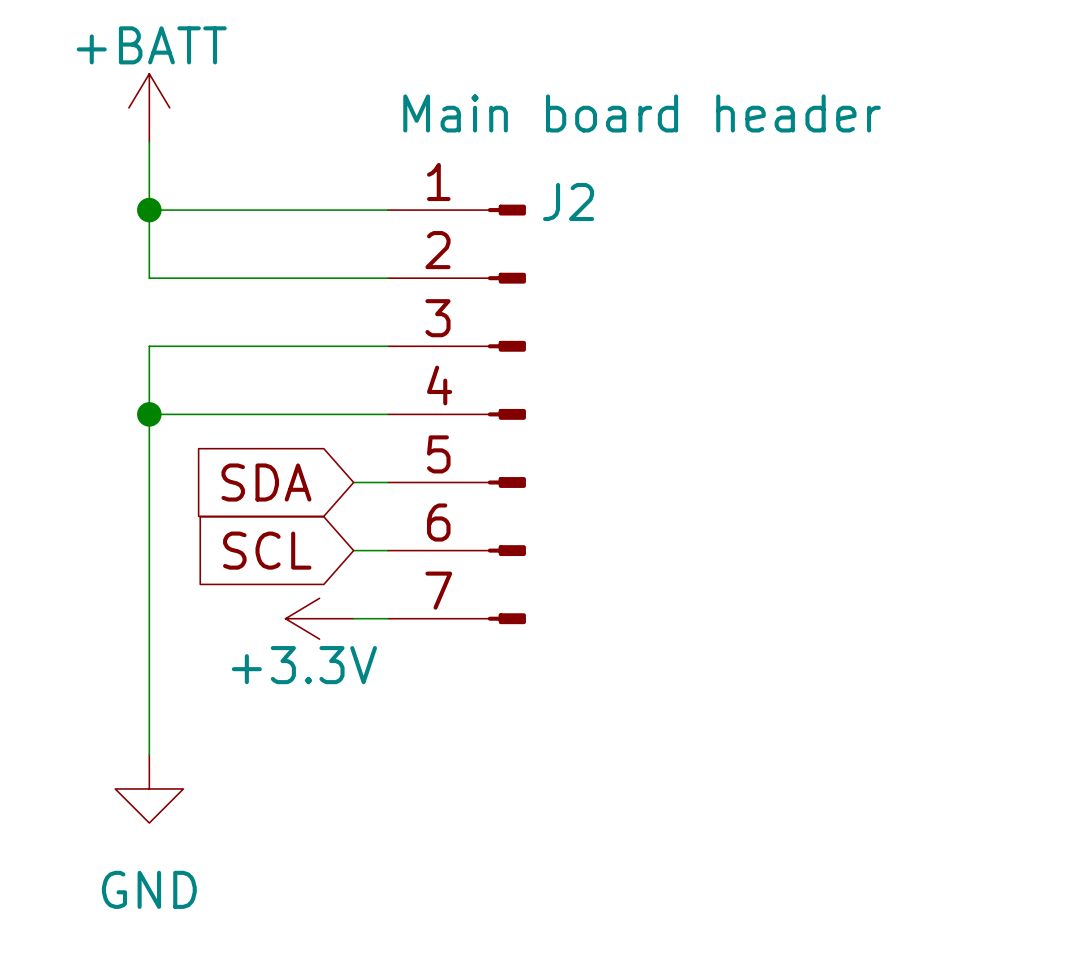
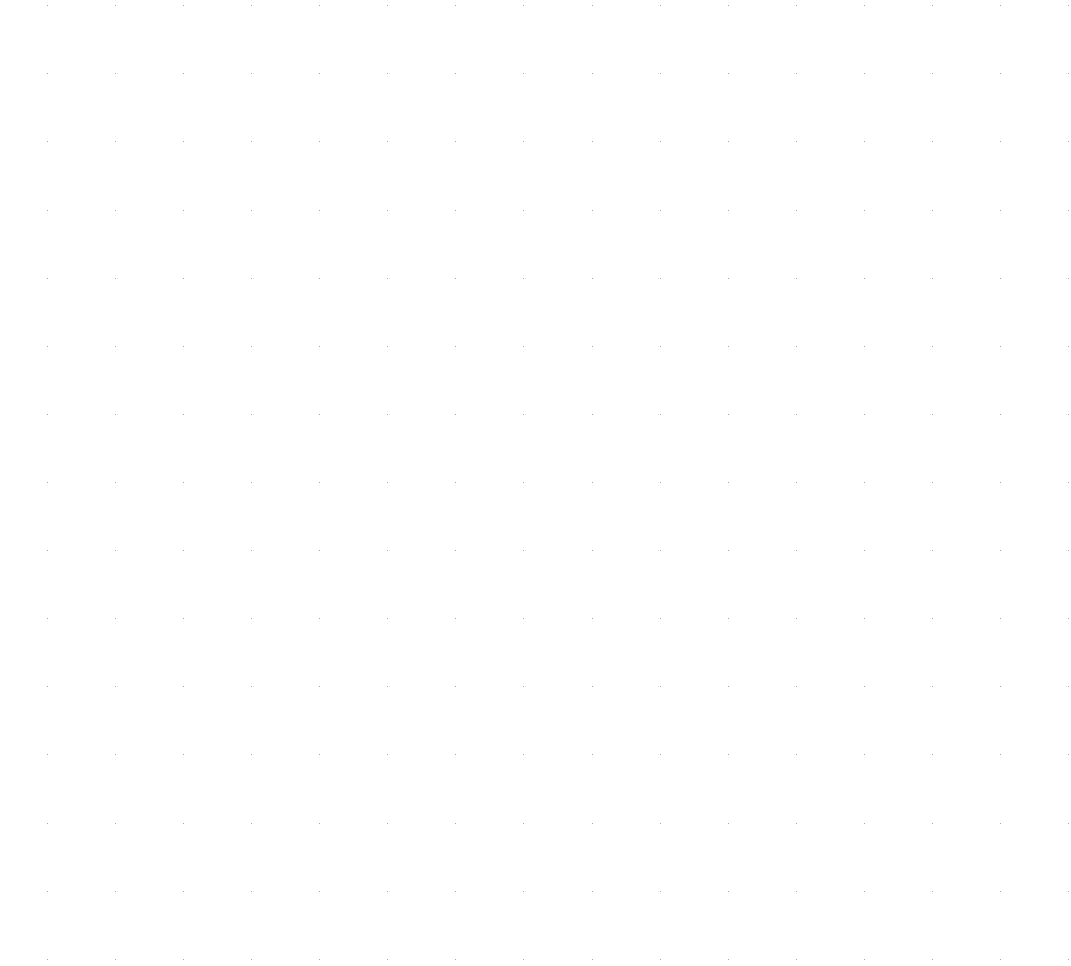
power symbol: +BATT (149, 107) -> none
wire: (149, 141) (149, 278) (387, 278) -> none
wire: (149, 210) (387, 210) -> none
junction: (149, 210) -> none
wire: (387, 346) (149, 346) (149, 754) -> none
wire: (149, 414) (387, 414) -> none
junction: (149, 414) -> none
J2: Main board header (456, 414) -> none
global label: SDA (266, 482) -> none
wire: (353, 482) (387, 482) -> none
global label: SCL (267, 550) -> none
wire: (353, 550) (387, 550) -> none
power symbol: +3.3V (319, 618) -> none
wire: (353, 618) (387, 618) -> none
power symbol: GND (149, 788) -> none

